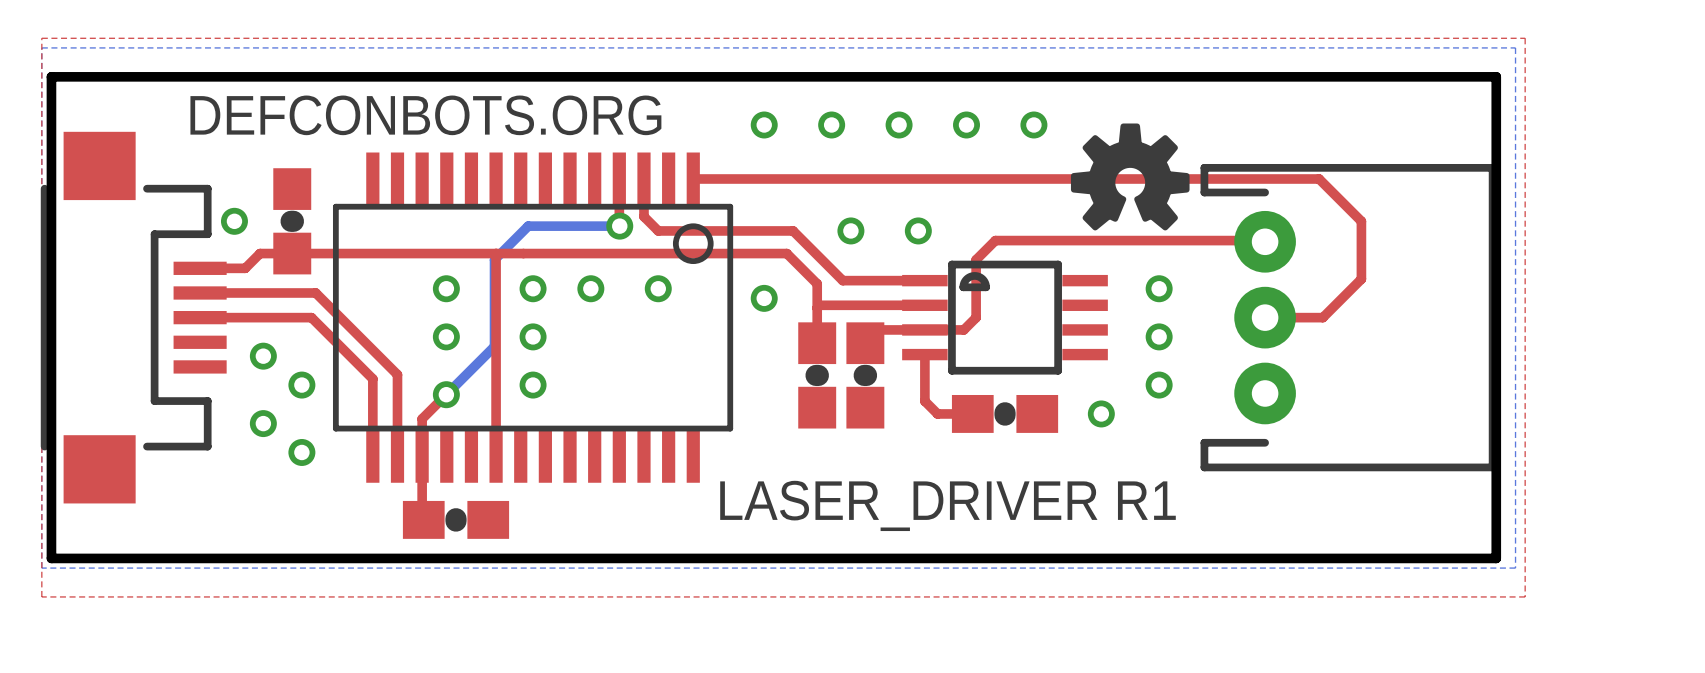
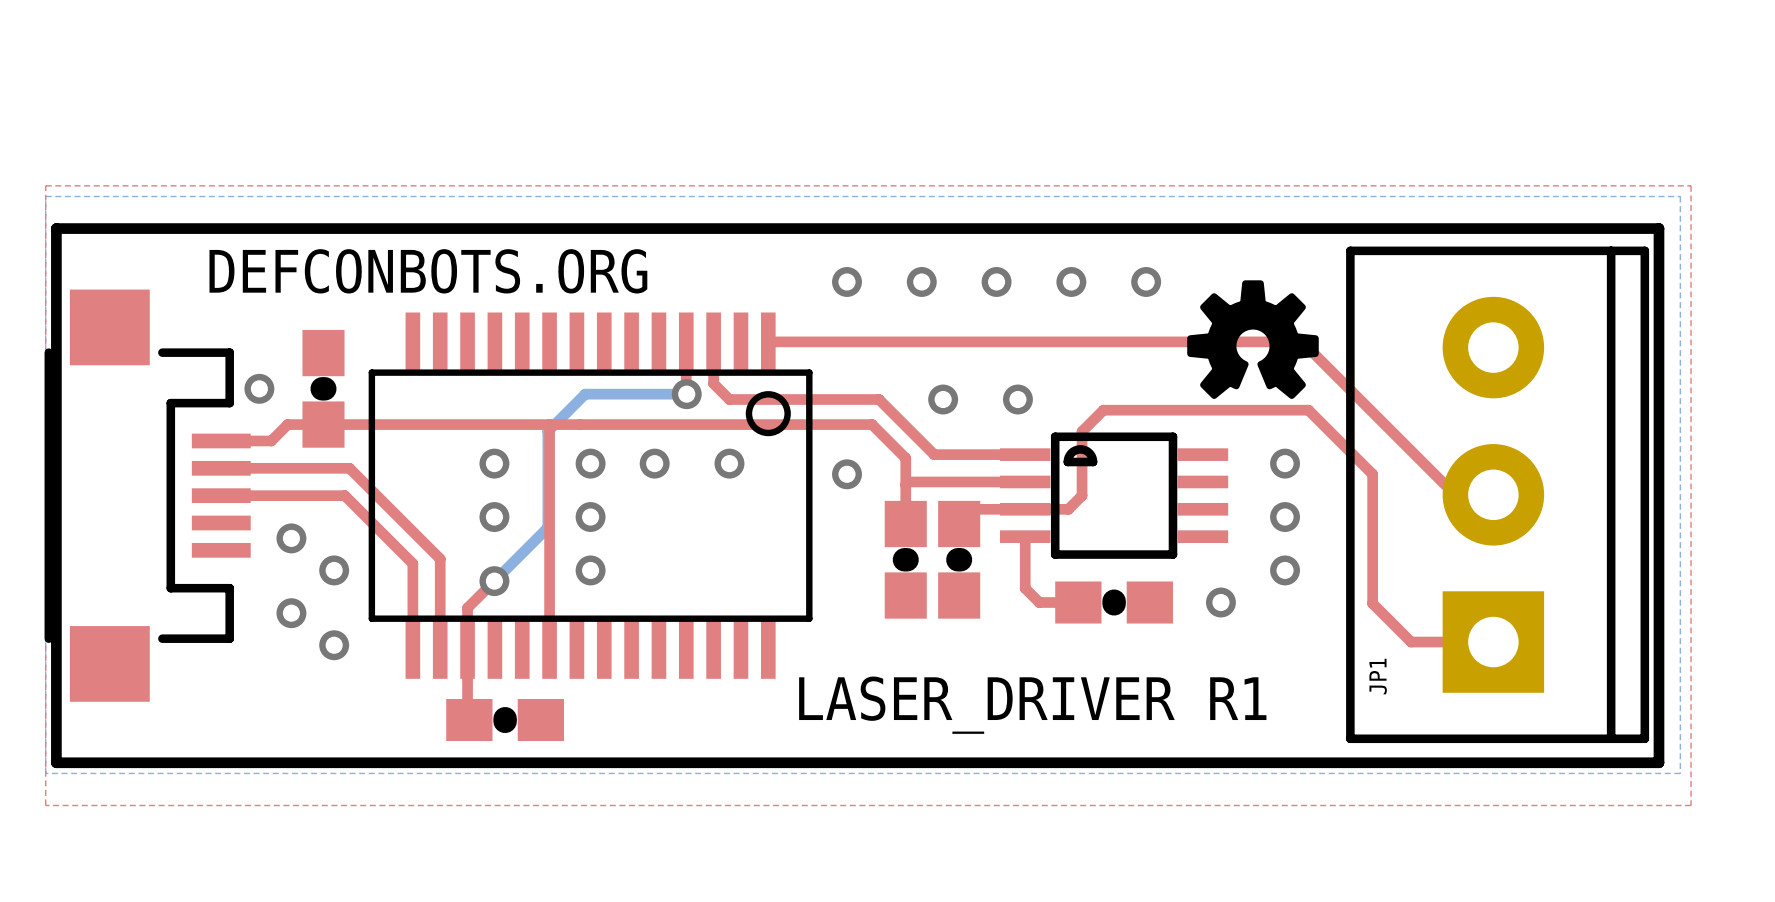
top track: (1174, 178) (1319, 178) (1361, 221) (1361, 279) (1322, 317) (1265, 317) -> (1302, 341) (1455, 494) (1493, 494)
top track: (1180, 240) (1265, 241) -> (1308, 410) (1372, 474) (1372, 603) (1411, 642) (1493, 642)
JP1: none -> (1497, 494)
part: (1348, 317) -> none

